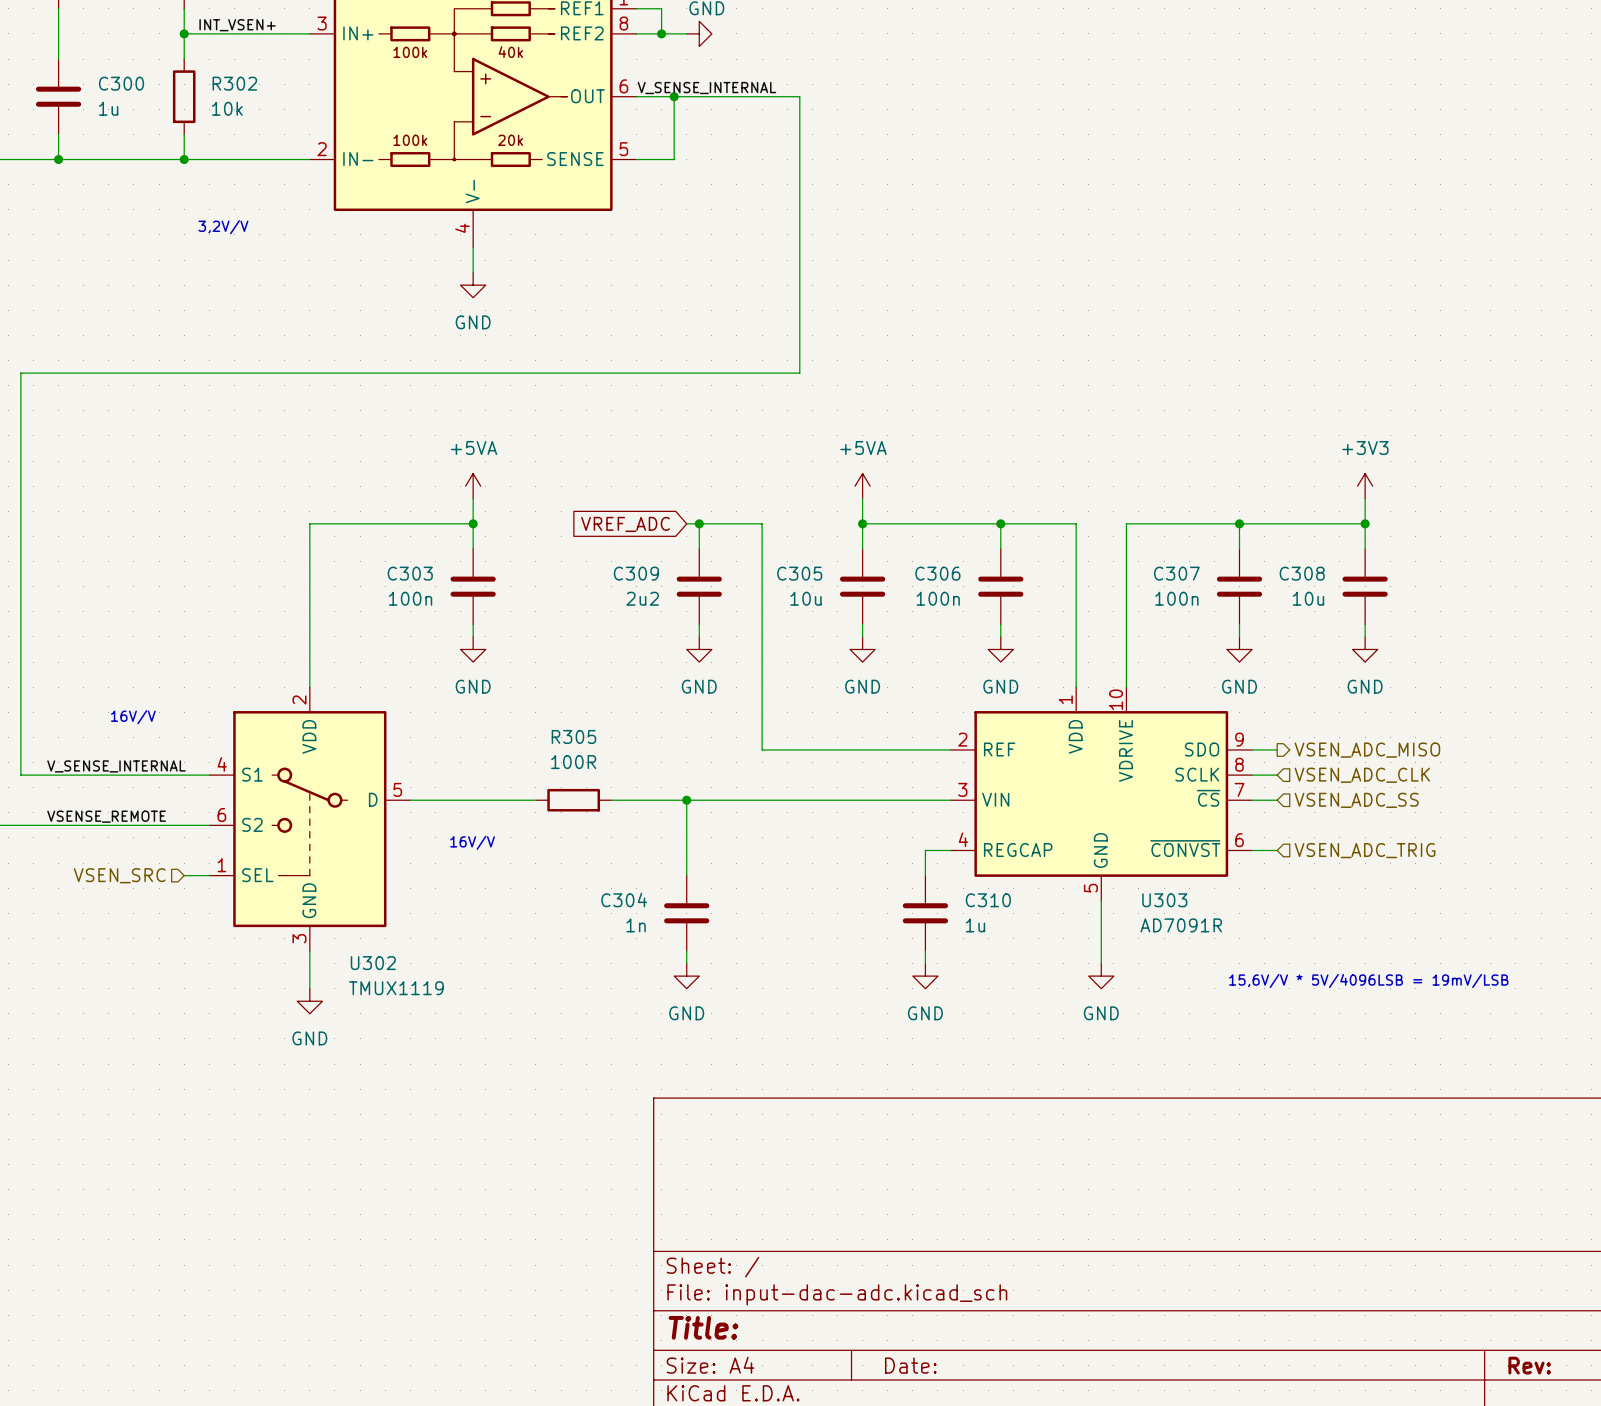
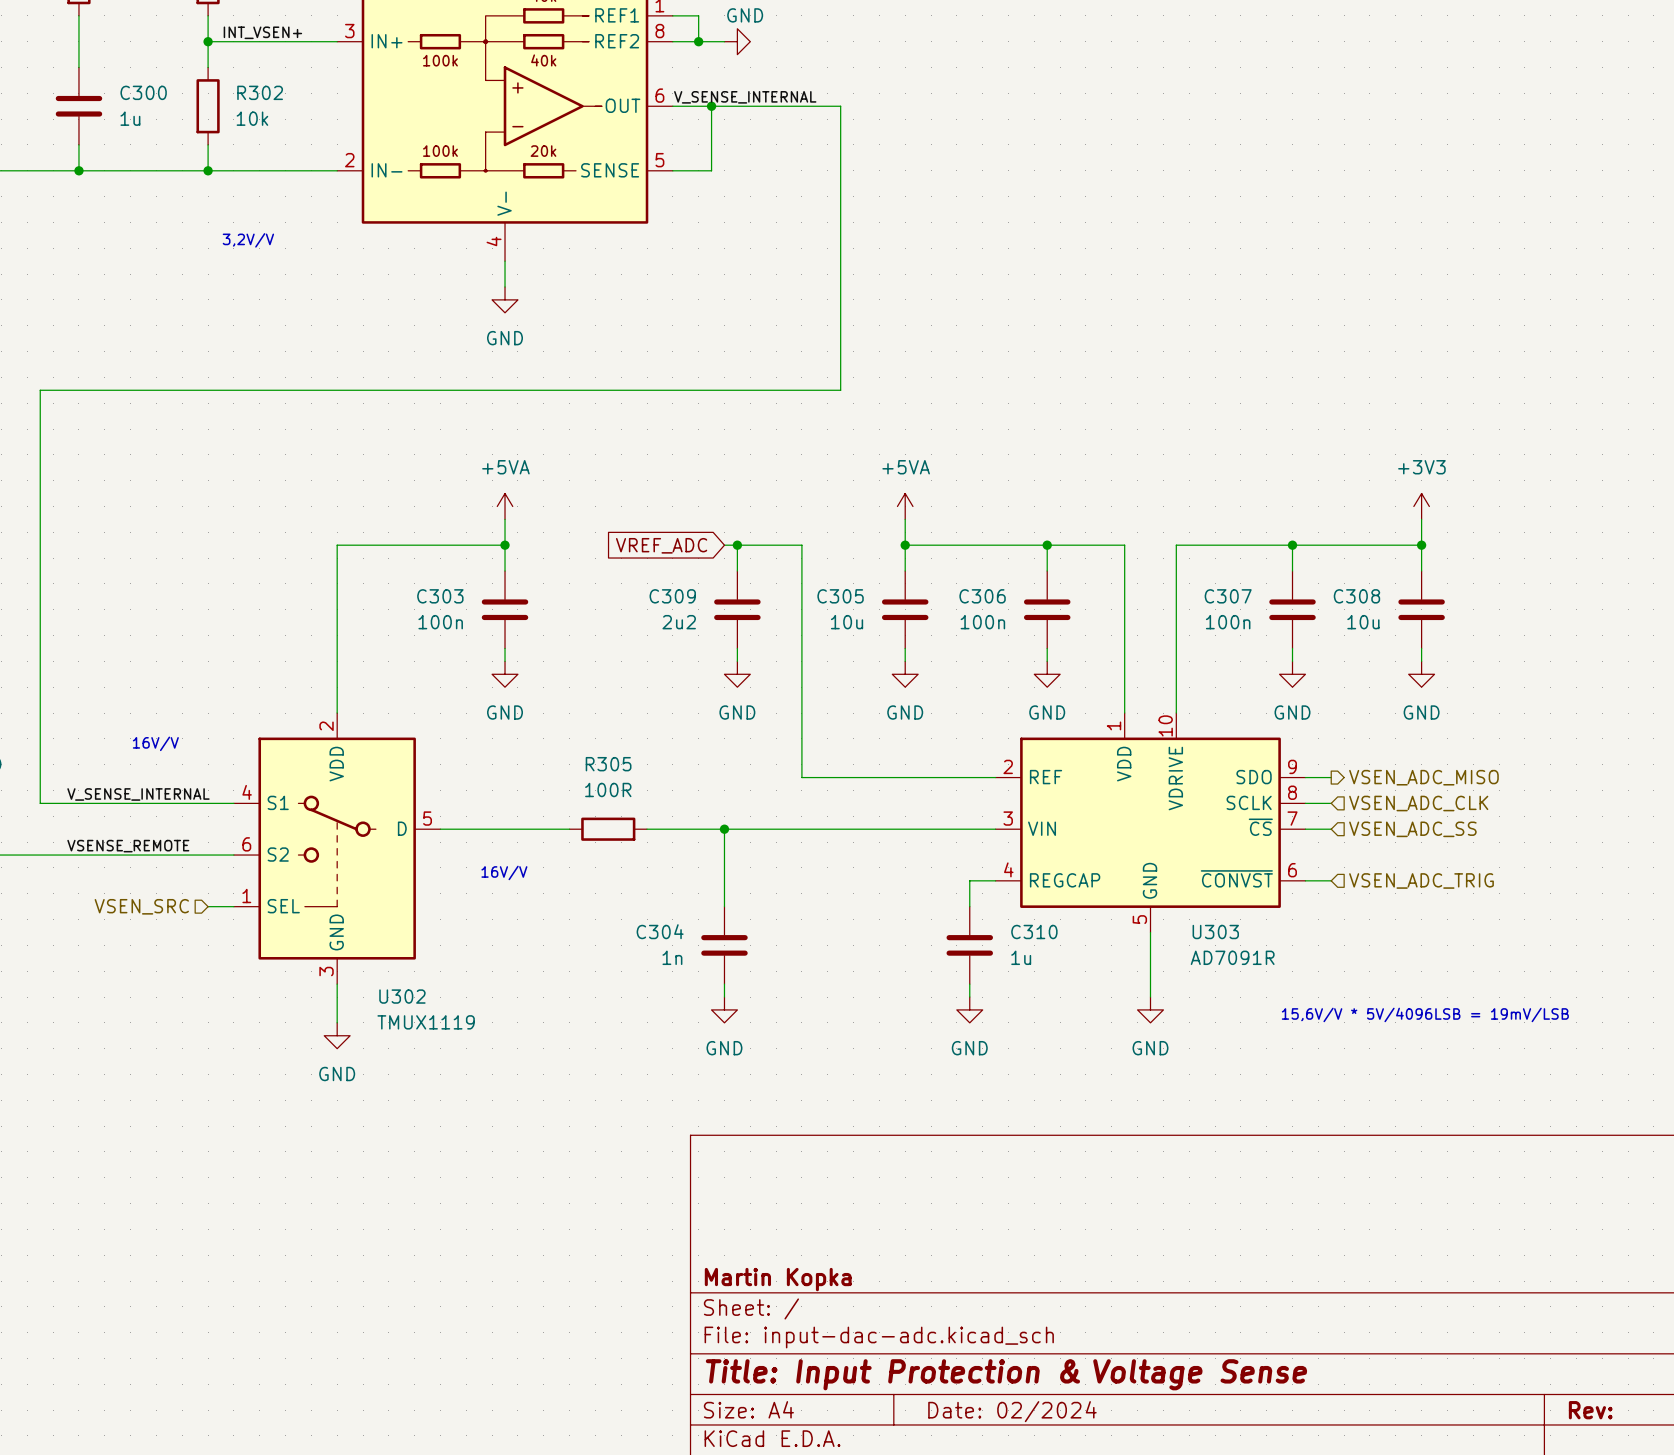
title block: none -> Martin Kopka (778, 1279)
title block: Title: (703, 1327) -> Title: Input Protection & Voltage Sense (1006, 1374)
title block: Date: (910, 1365) -> Date: 02/2024 (1012, 1411)

